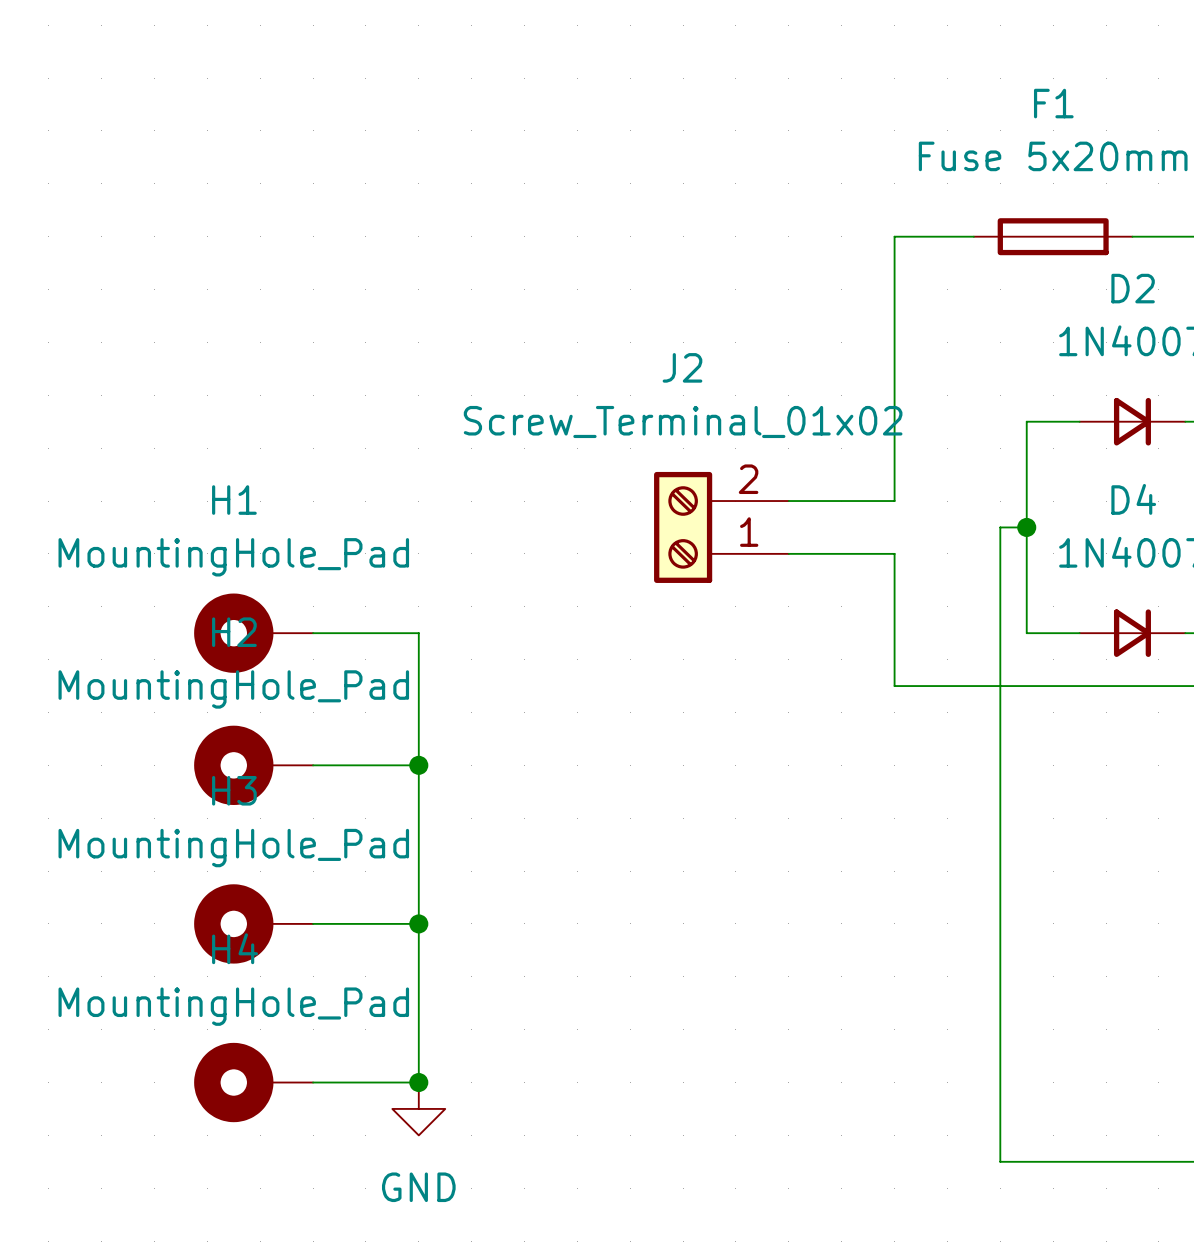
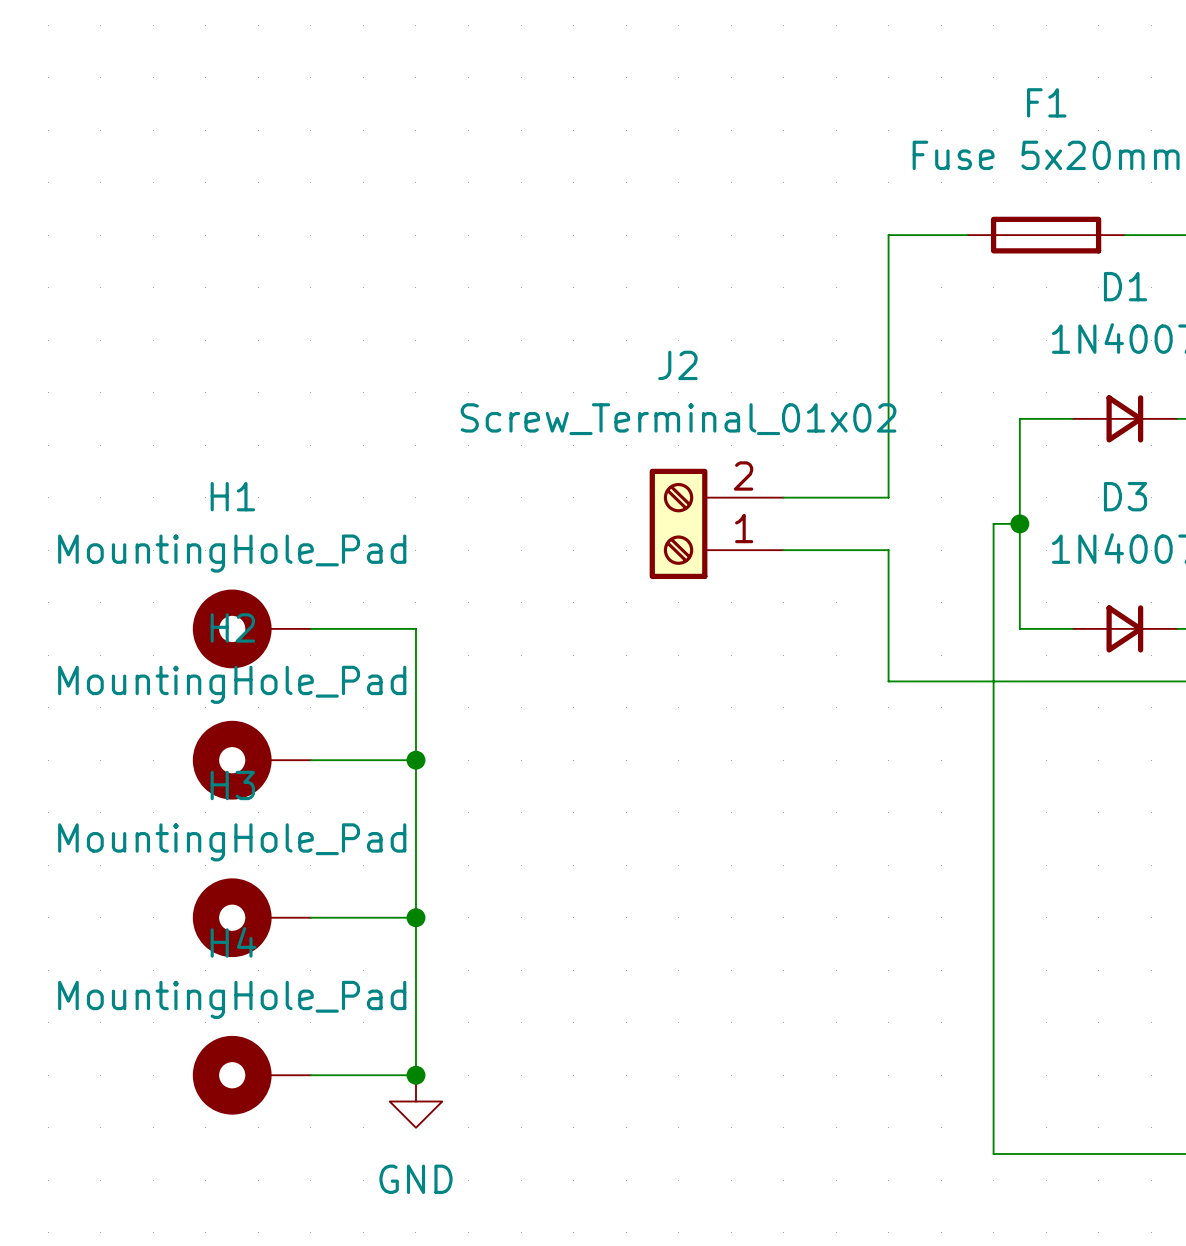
D2 name: D2 (1133, 288) -> D1 (1125, 286)
D4 name: D4 (1133, 499) -> D3 (1125, 496)

